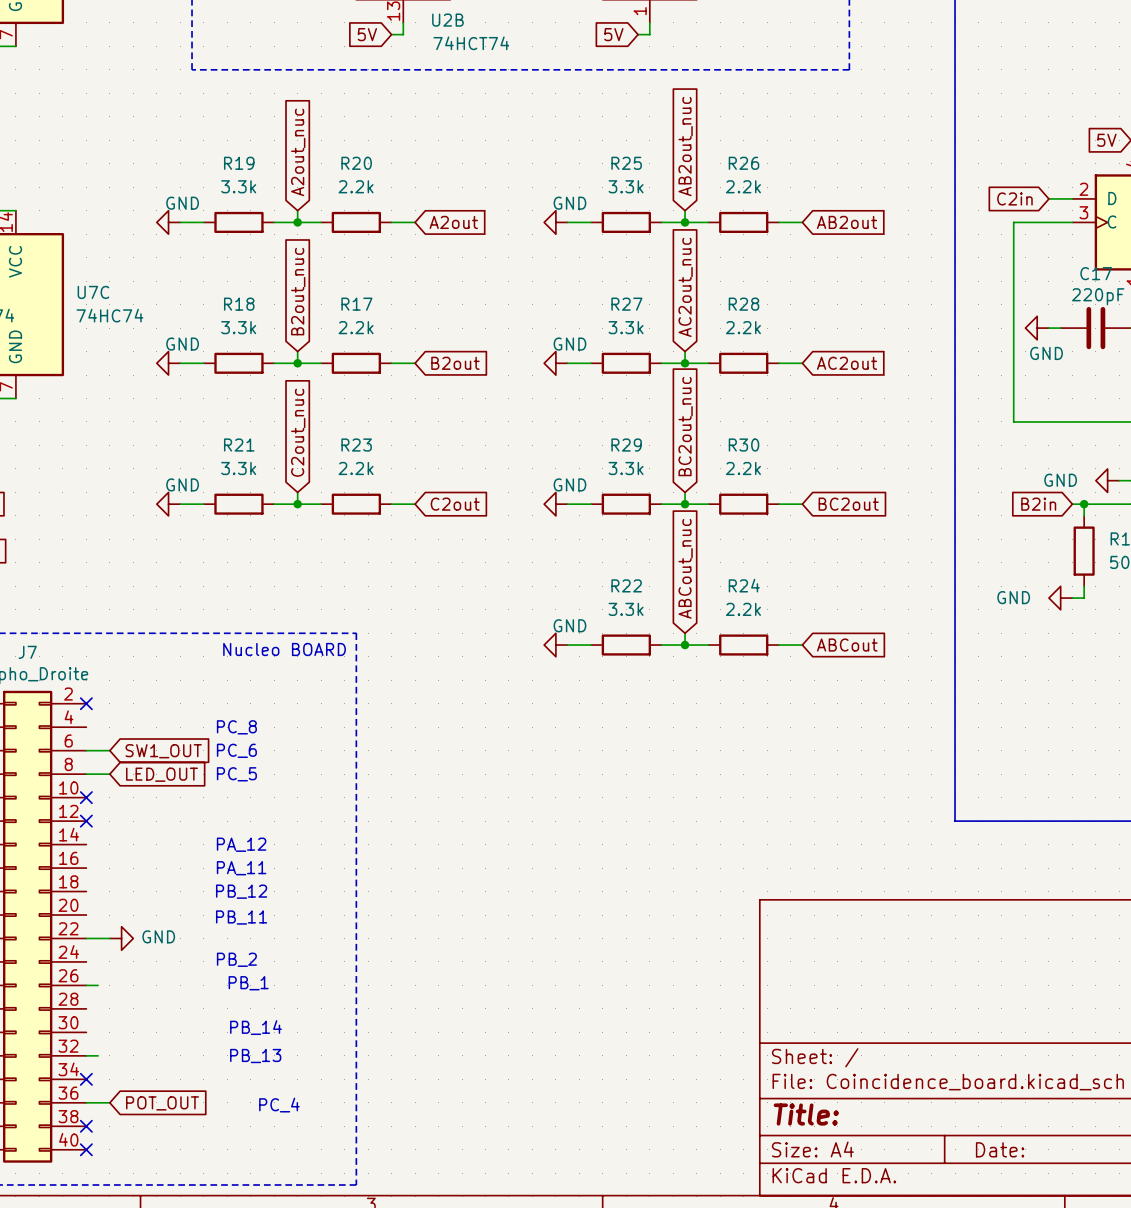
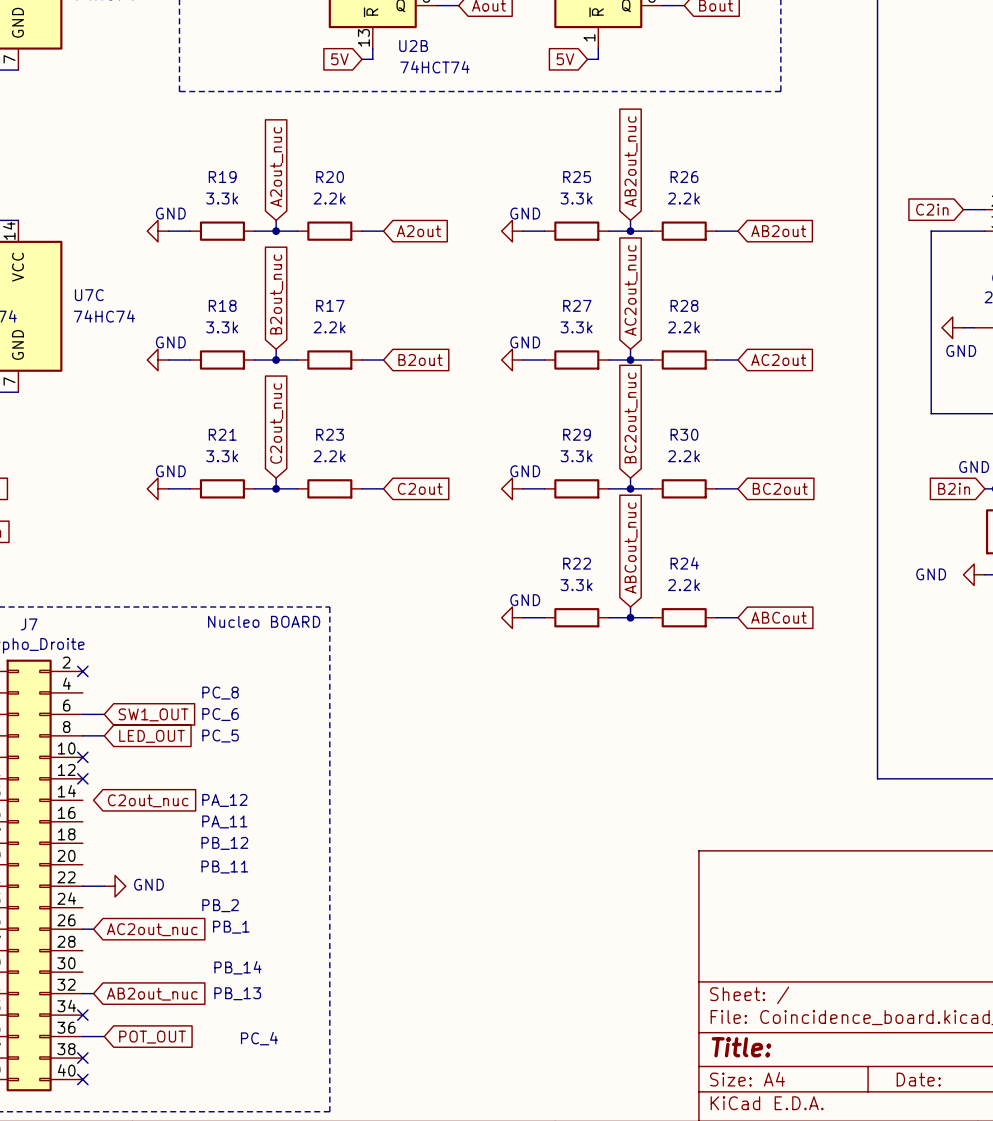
global label: none -> C2out_nuc (148, 800)
global label: none -> AC2out_nuc (152, 929)
global label: none -> AB2out_nuc (152, 994)

